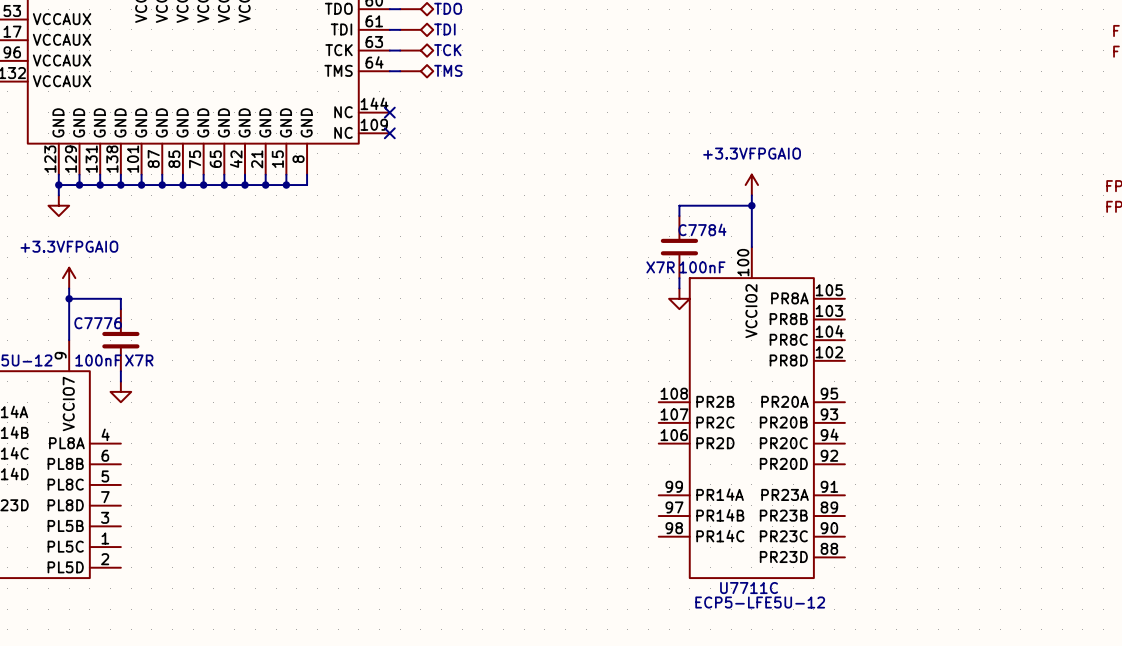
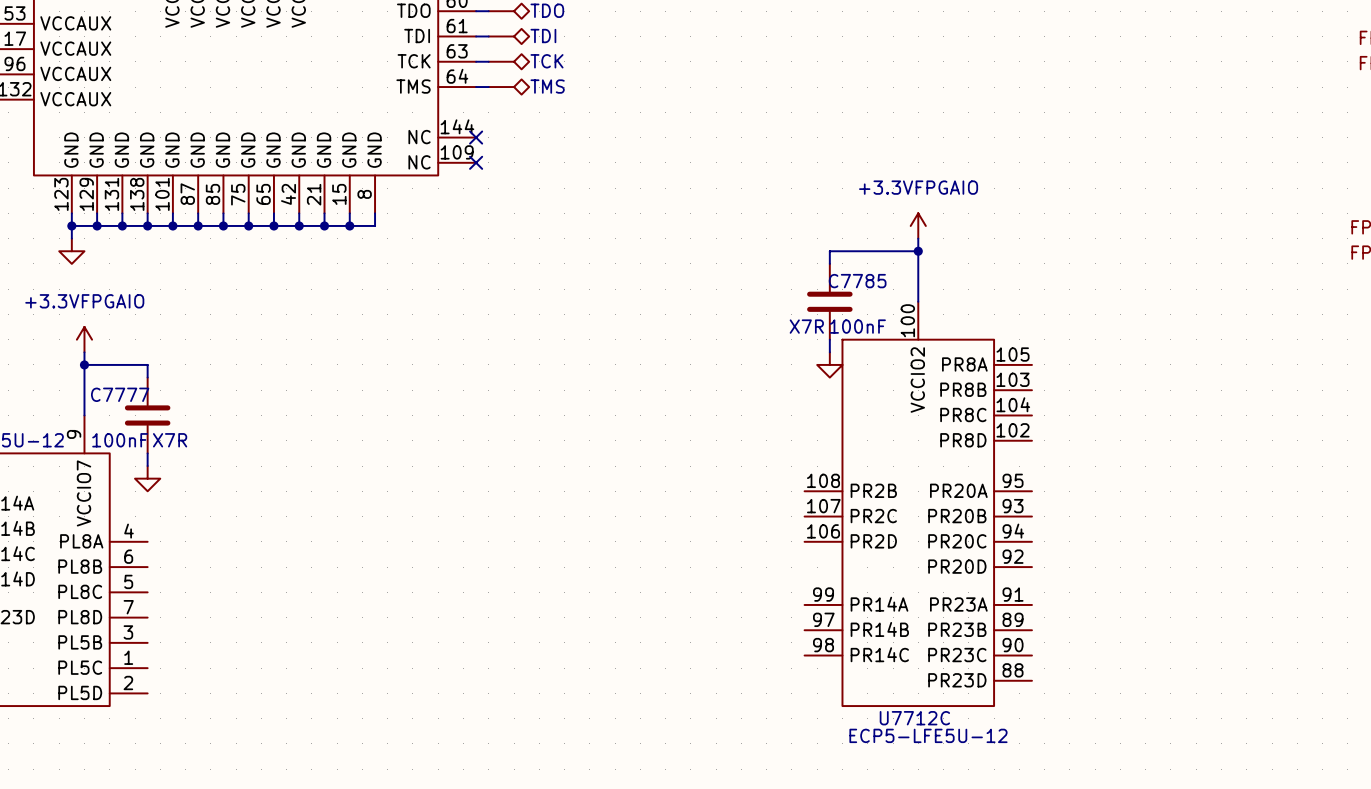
C7784 name: C7784 (702, 229) -> C7785 (857, 281)
C7776 name: C7776 (98, 323) -> C7777 (120, 394)
U7711C name: U7711C (749, 588) -> U7712C (914, 718)

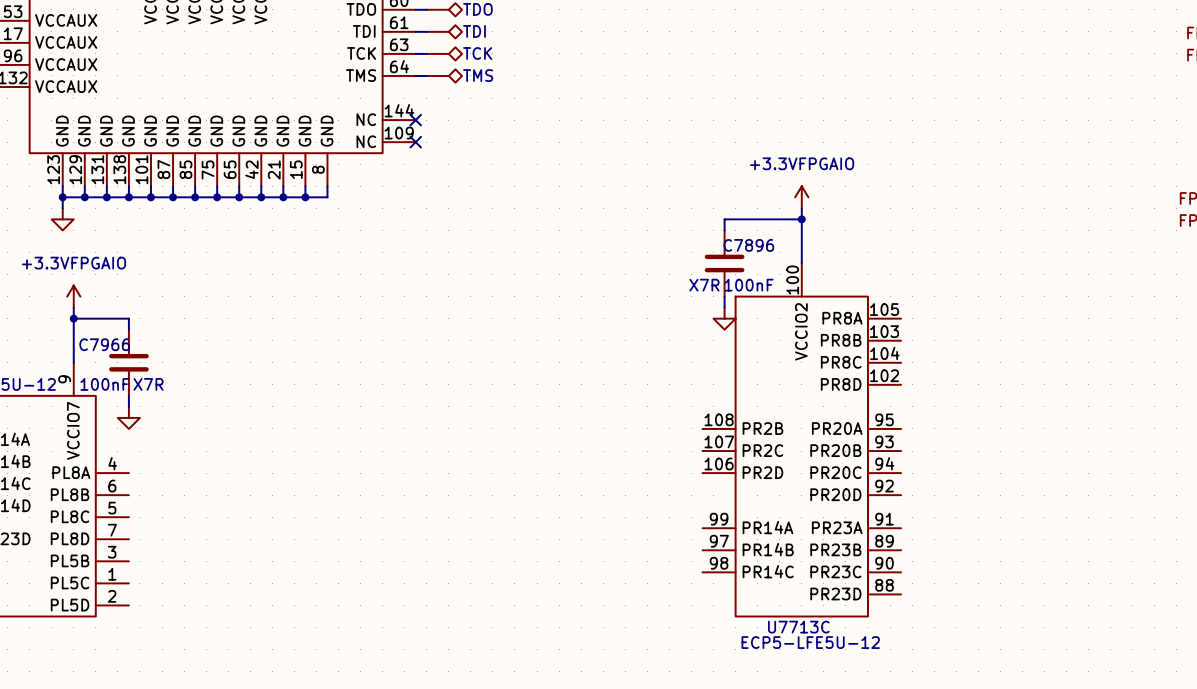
C7785 name: C7785 (857, 281) -> C7896 (748, 245)
C7777 name: C7777 (120, 394) -> C7966 (104, 344)
U7712C name: U7712C (914, 718) -> U7713C (798, 627)

